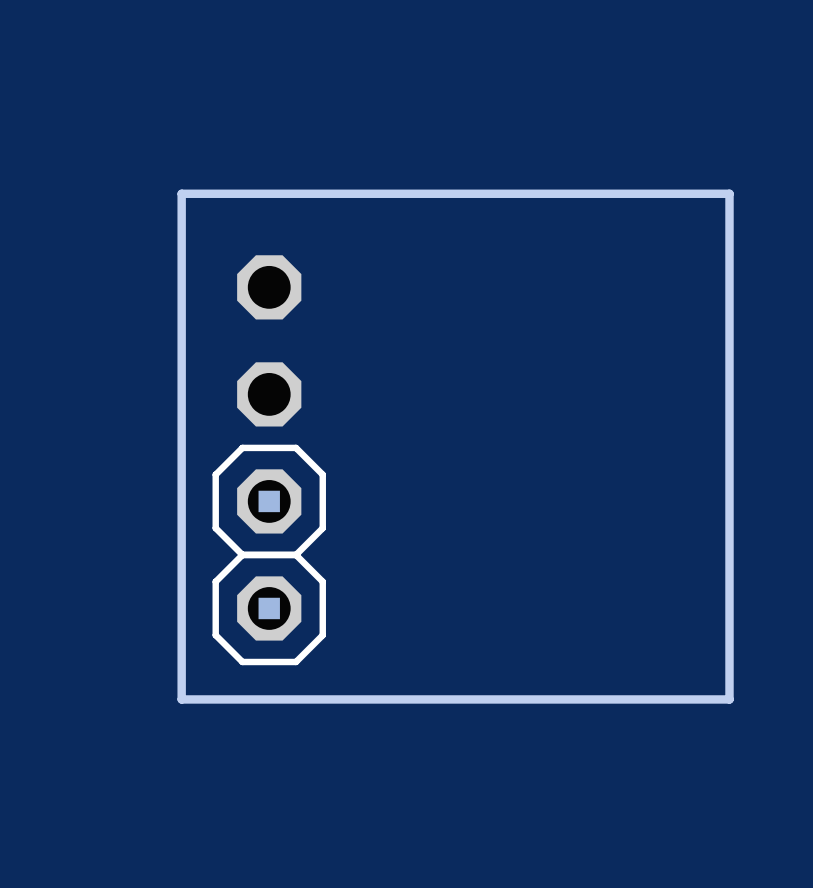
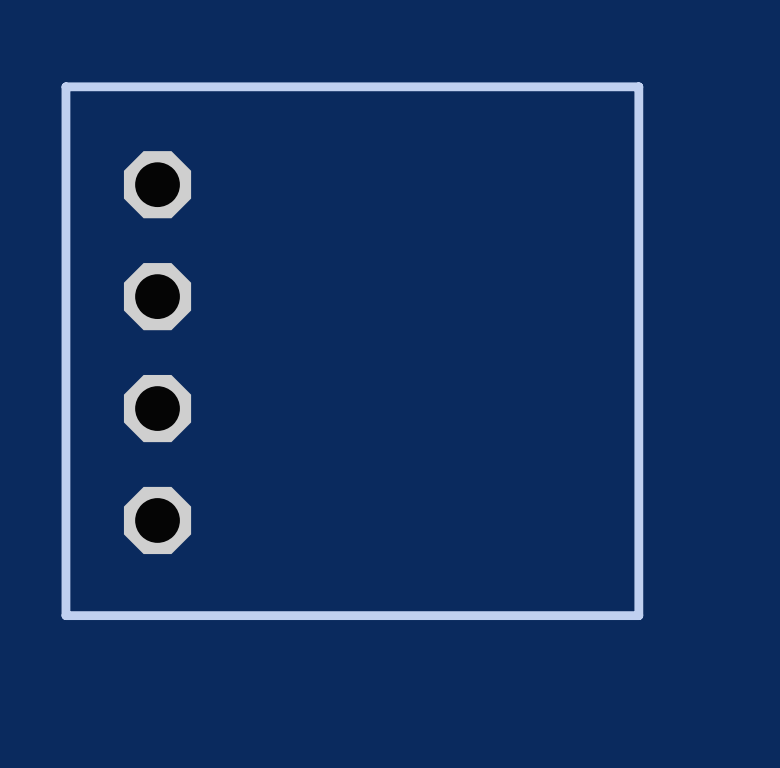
part side: bottom (269, 501) -> top (157, 408)
part side: bottom (269, 608) -> top (157, 520)

